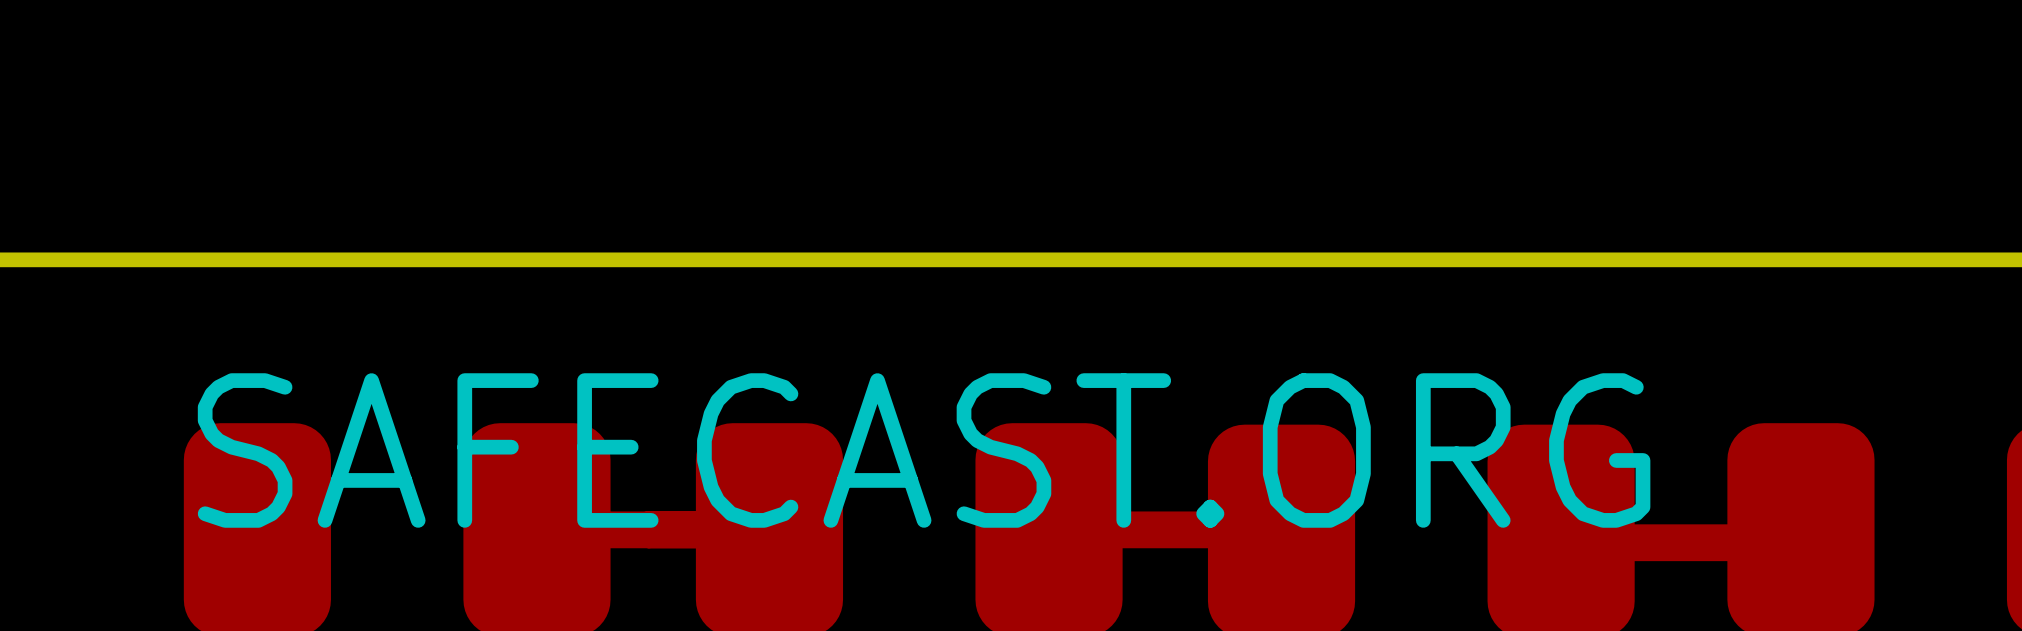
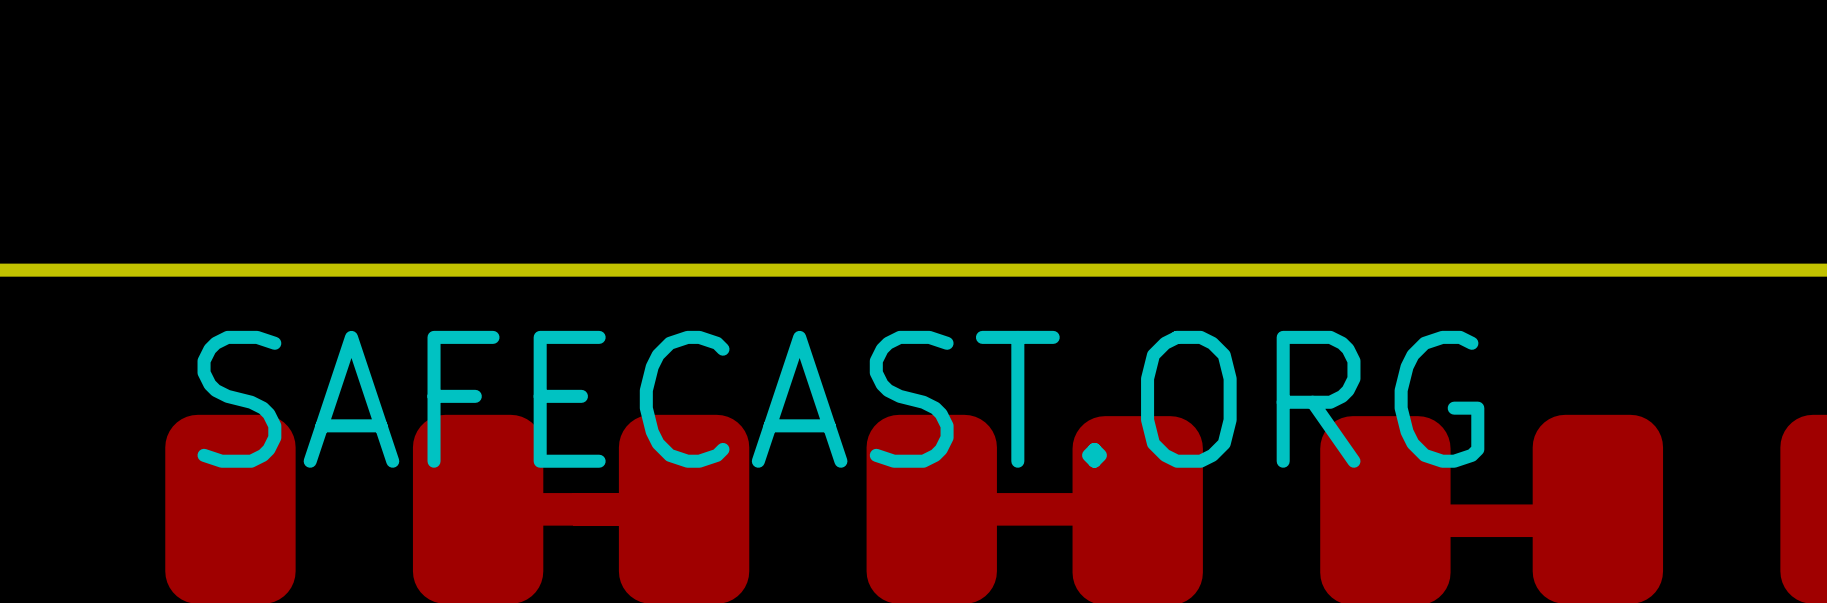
text position: SAFECAST.ORG (924, 450) -> SAFECAST.ORG (840, 399)

